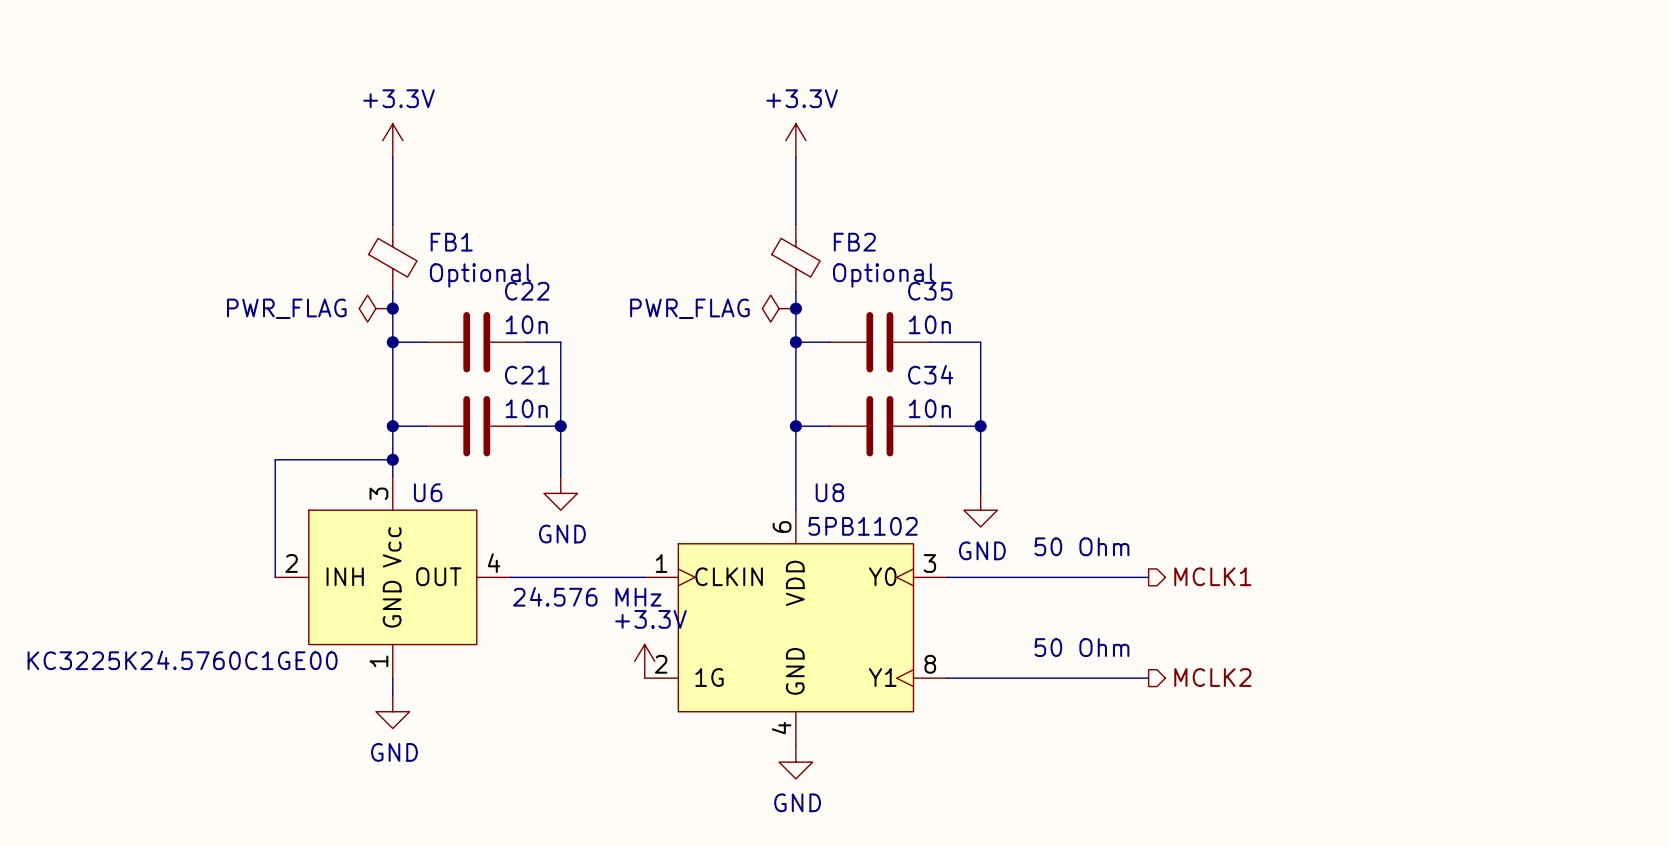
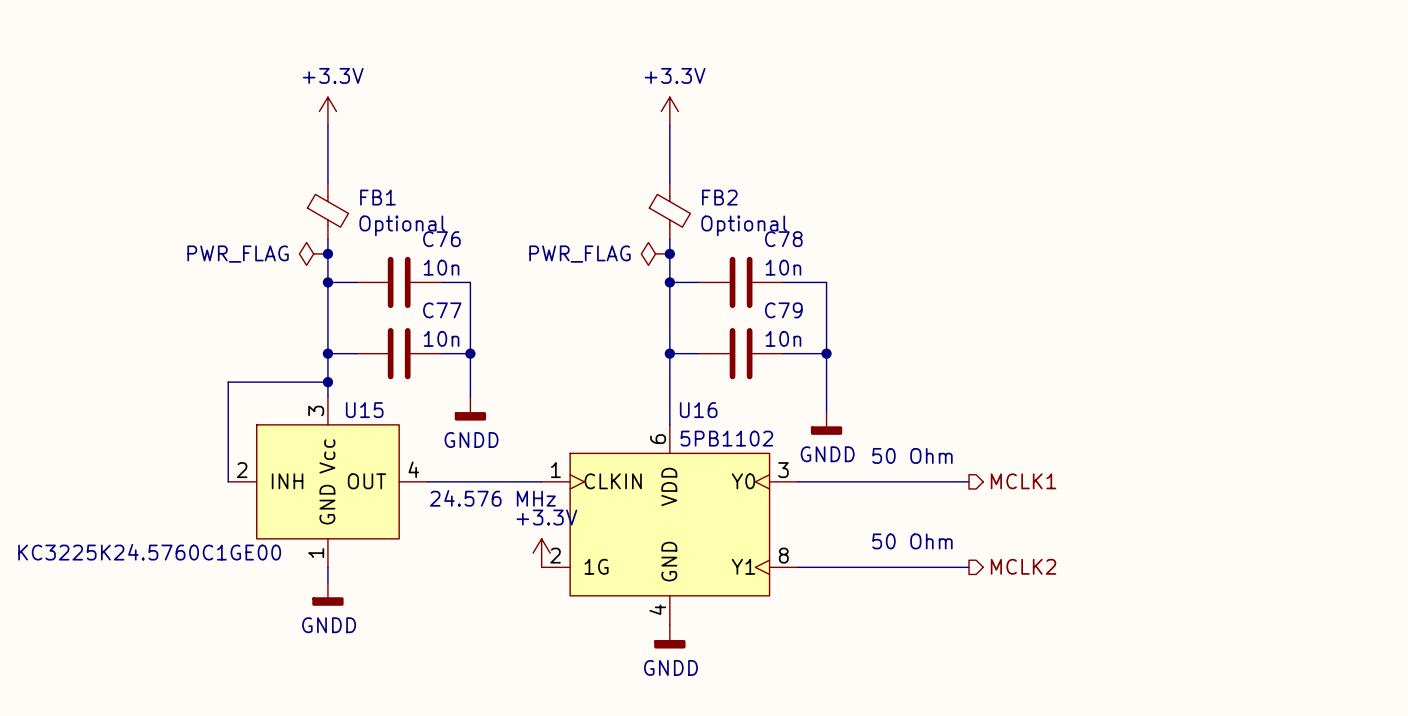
C22 name: C22 (527, 291) -> C76 (441, 239)
C35 name: C35 (930, 291) -> C78 (783, 239)
C34 name: C34 (930, 374) -> C79 (783, 310)
C21 name: C21 (527, 375) -> C77 (442, 310)
U6 name: U6 (428, 492) -> U15 (364, 410)
U8 name: U8 (829, 492) -> U16 (698, 410)
power symbol: GND (560, 493) -> GNDD (470, 408)
power symbol: GND (980, 510) -> GNDD (826, 422)
power symbol: GND (392, 711) -> GNDD (327, 593)
power symbol: GND (795, 762) -> GNDD (669, 636)

